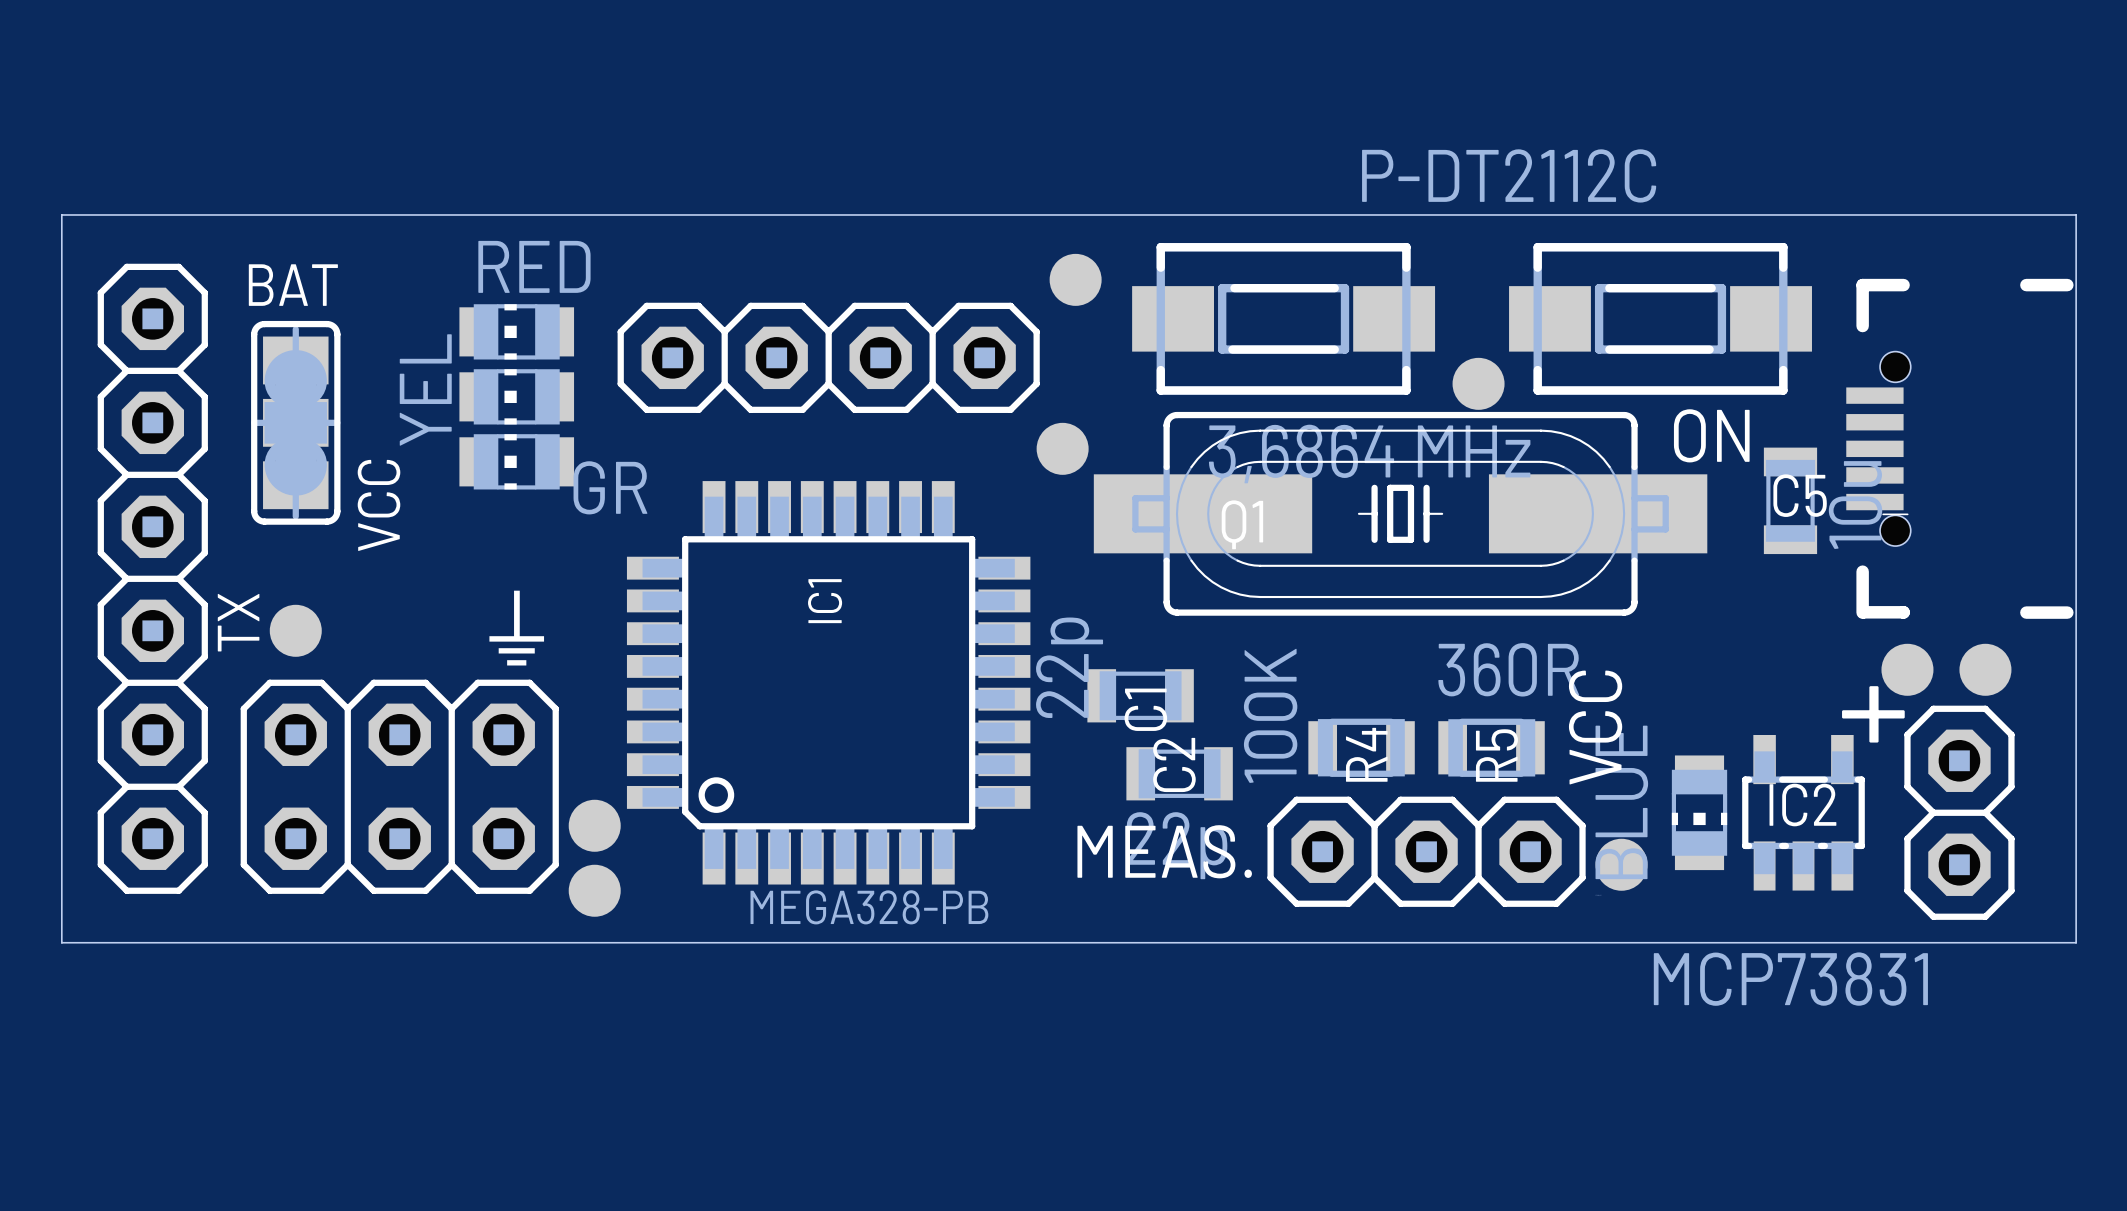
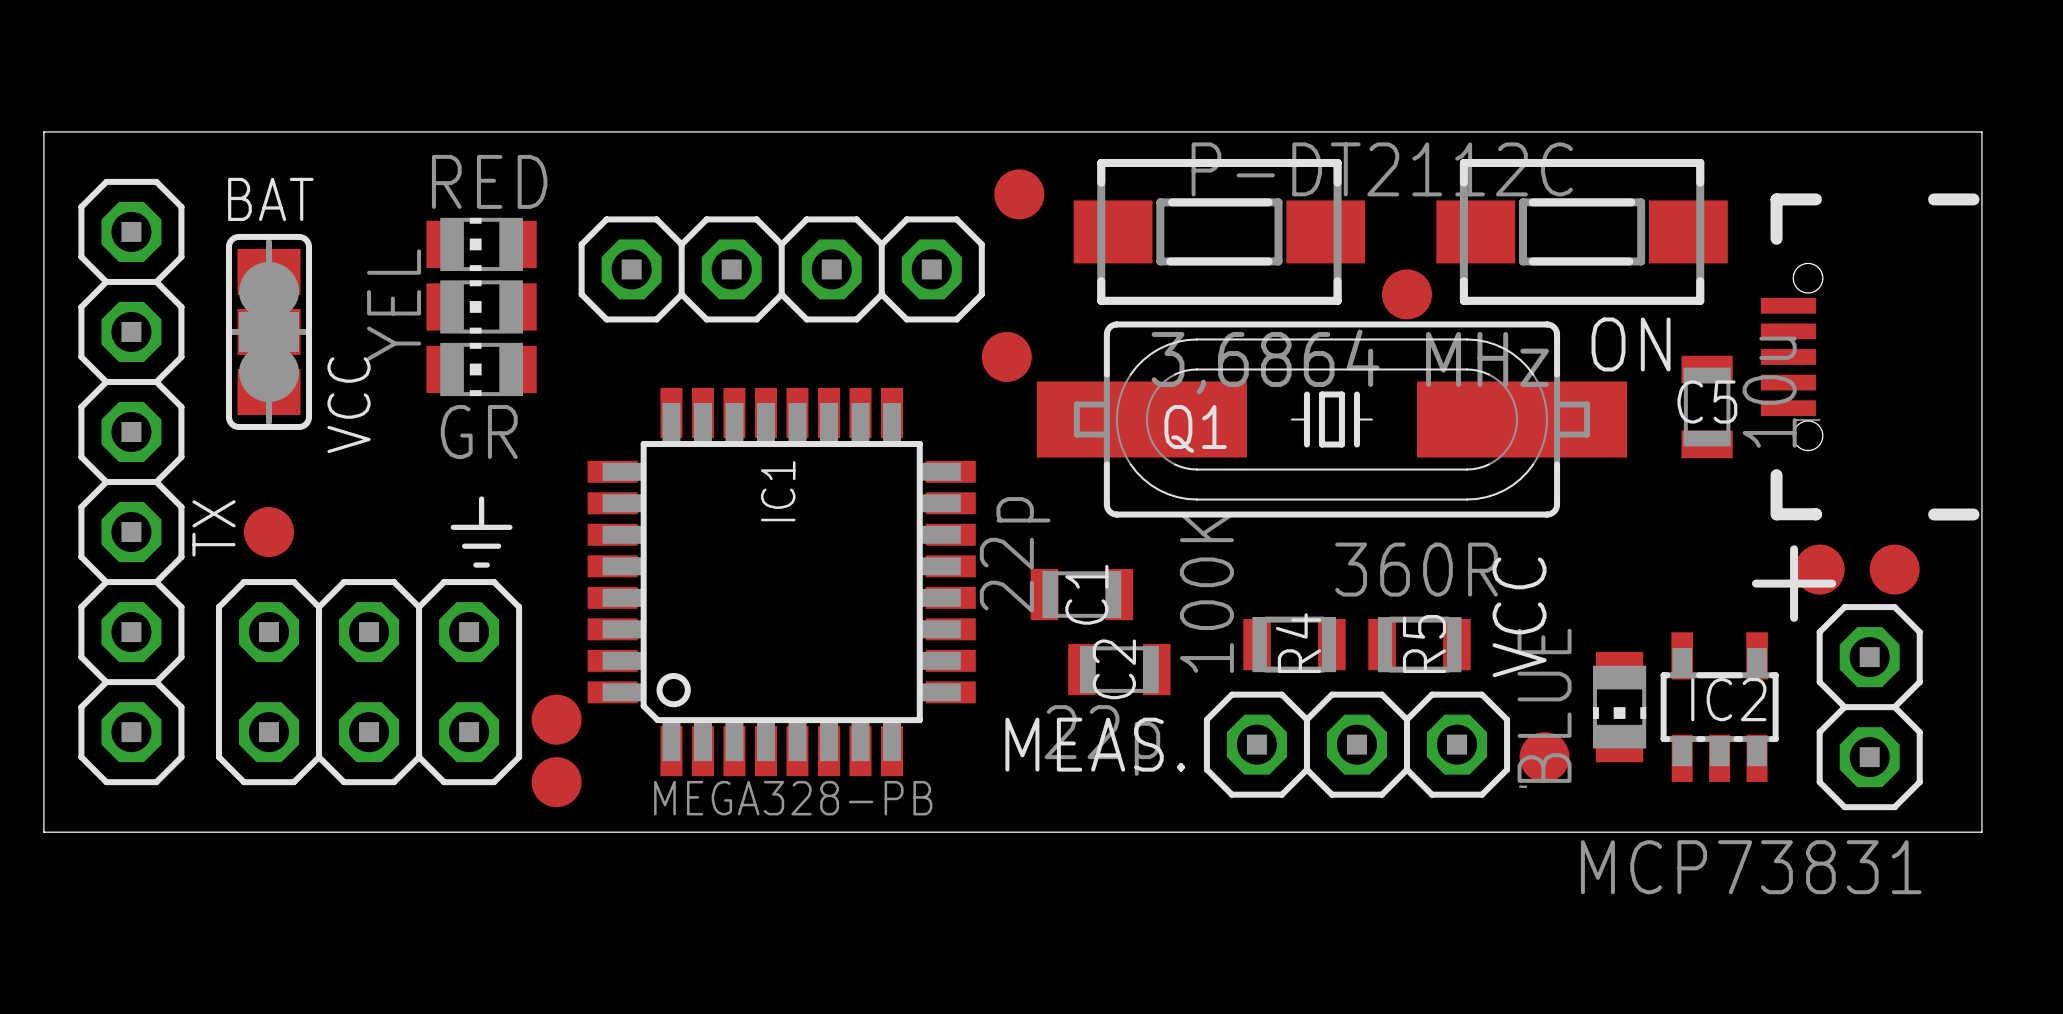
part value position: P-DT2112C (1509, 175) -> P-DT2112C (1382, 169)
part value position: GR (610, 487) -> GR (479, 432)

